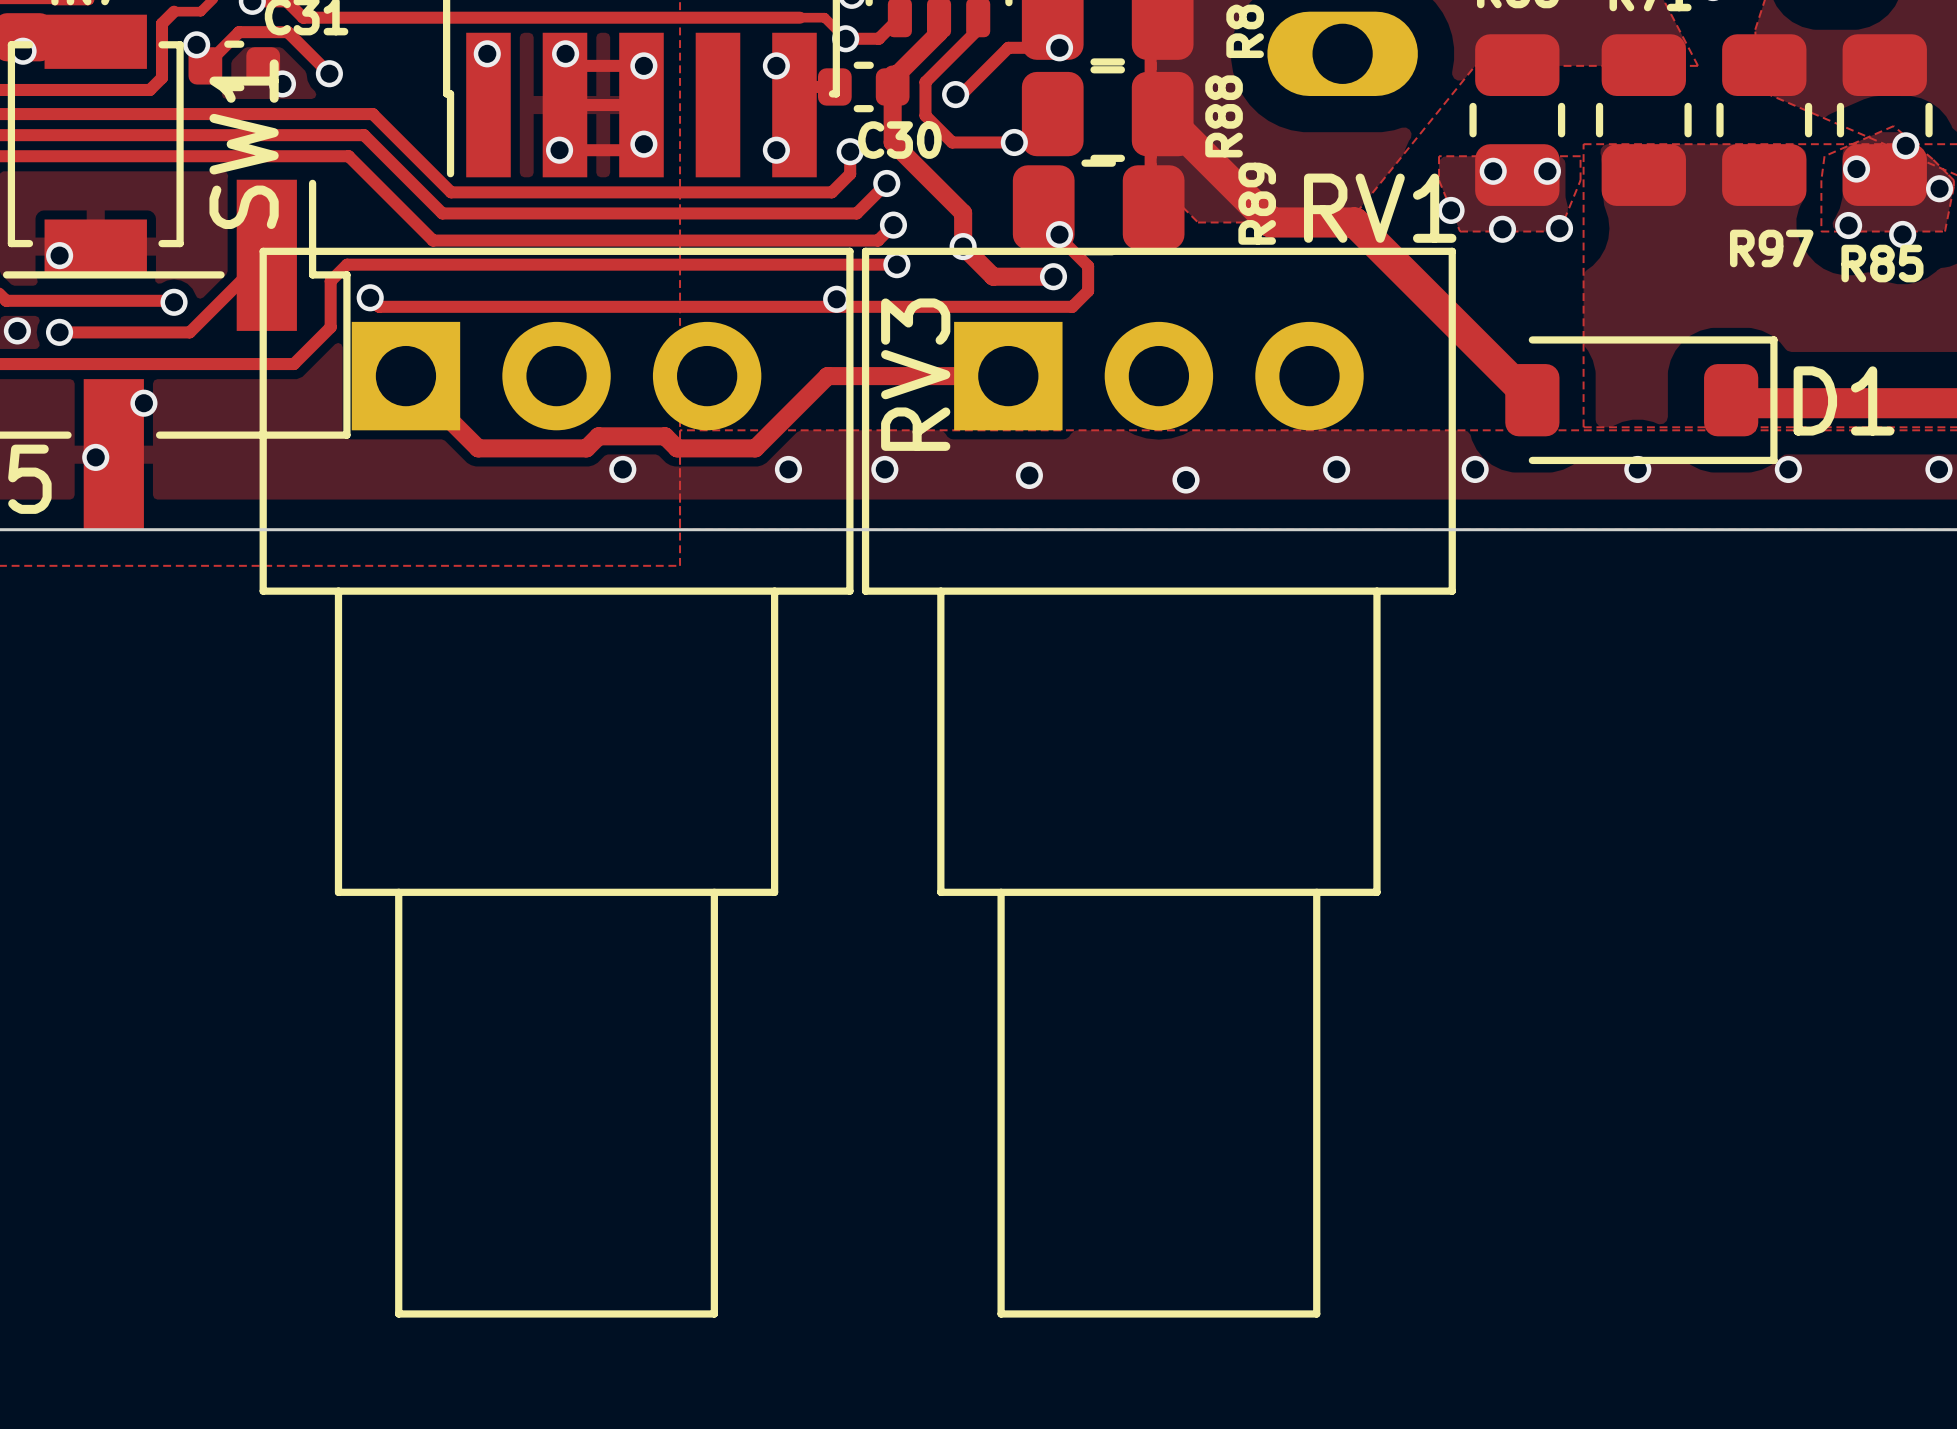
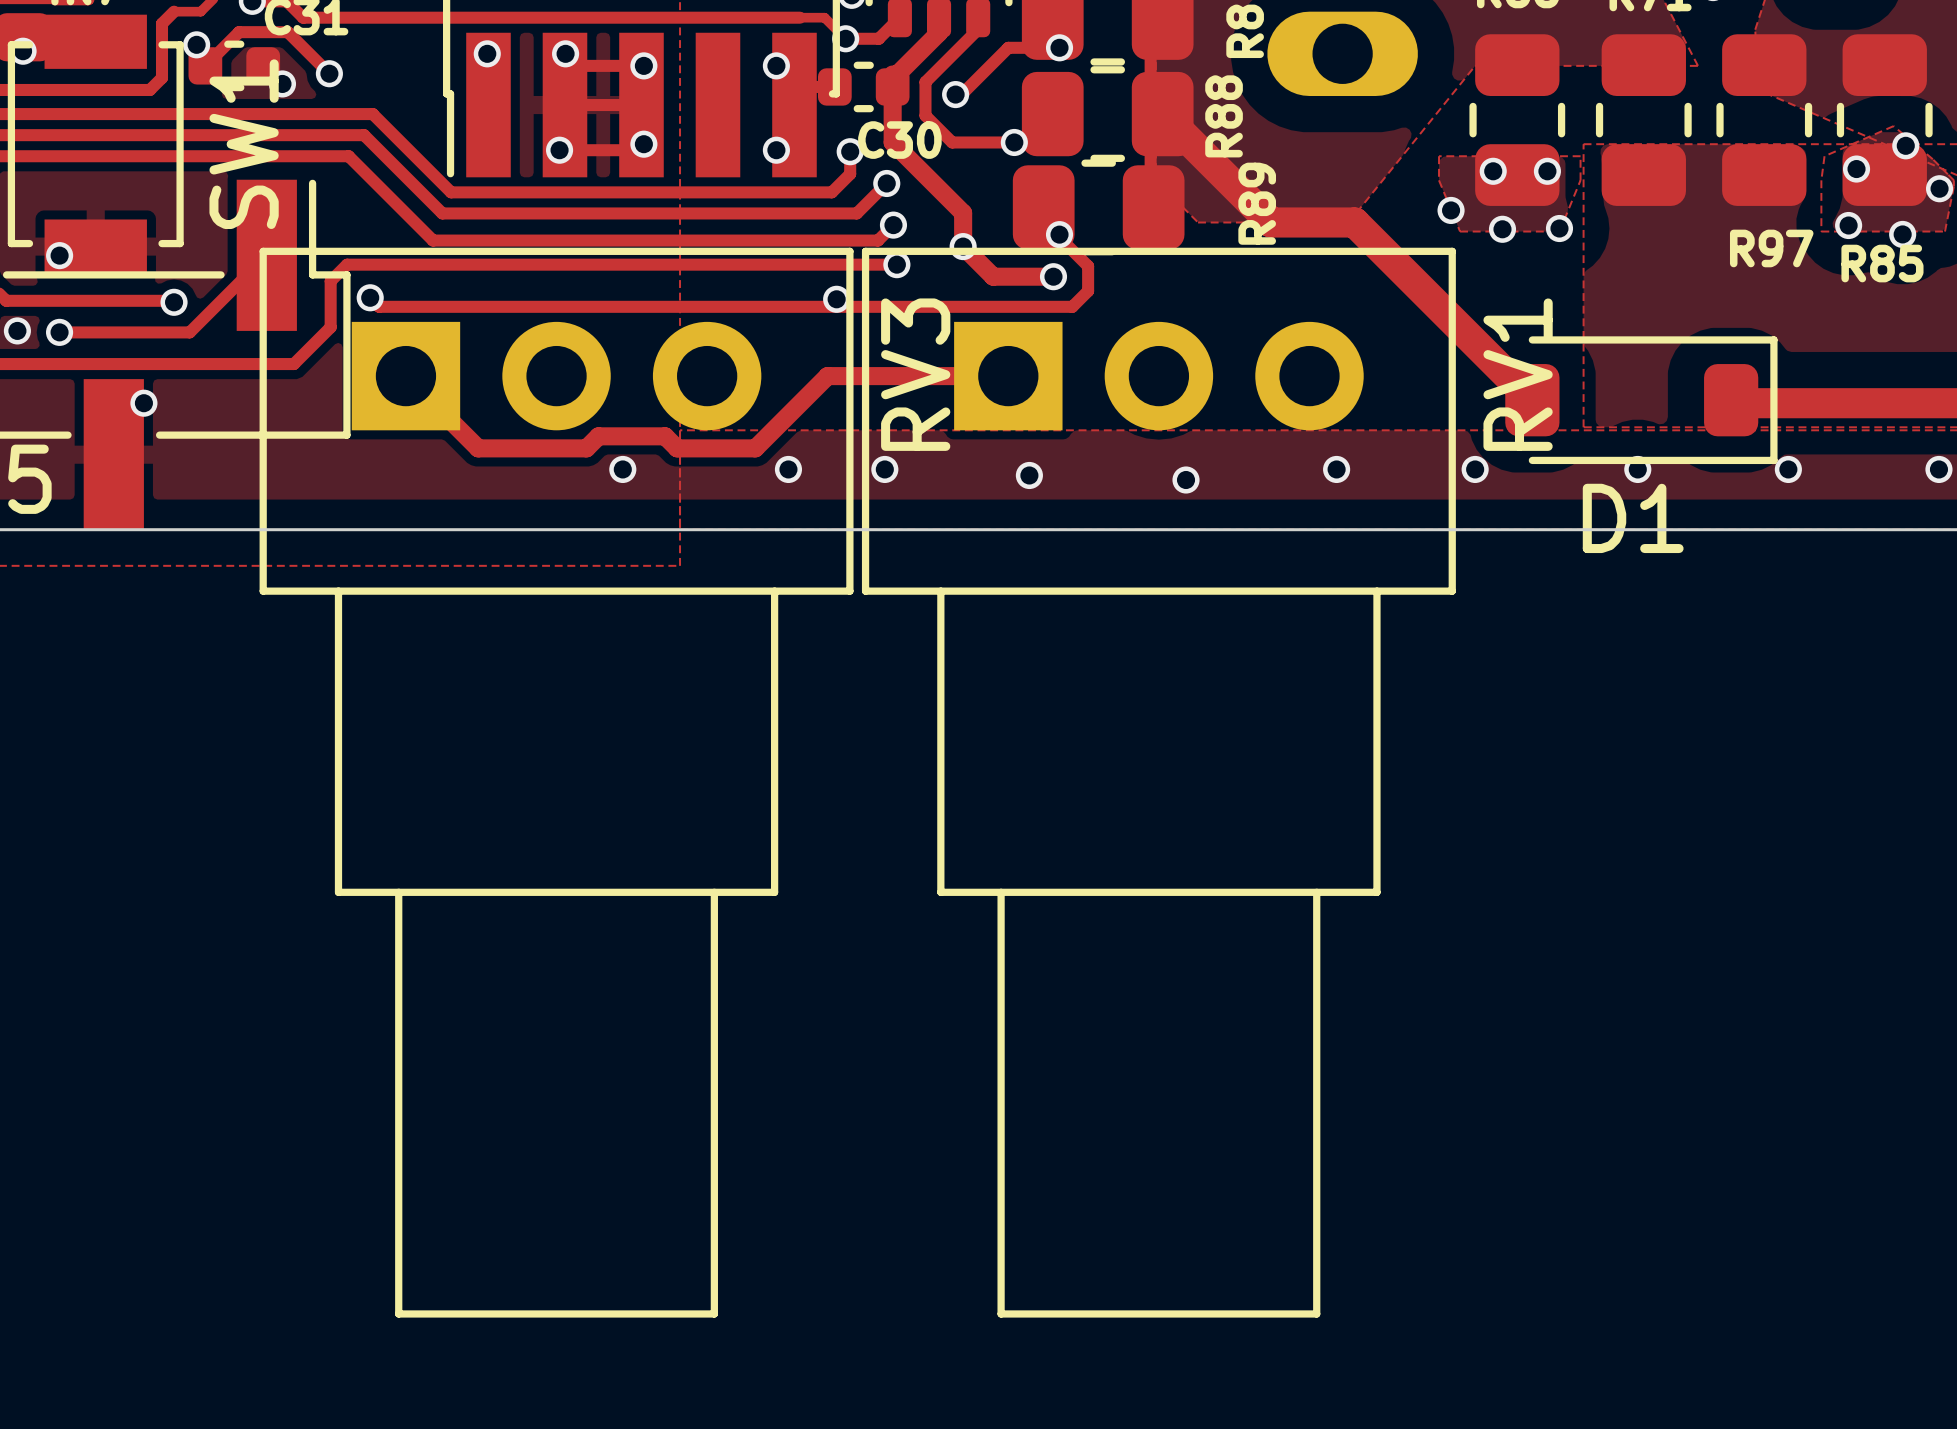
RV1 name rotation: 0° (1380, 208) -> 90° counterclockwise (1518, 374)
RV1 name position: RV1 (1380, 208) -> RV1 (1518, 374)
D1 name position: D1 (1844, 400) -> D1 (1633, 518)
via: (95, 457) -> none

